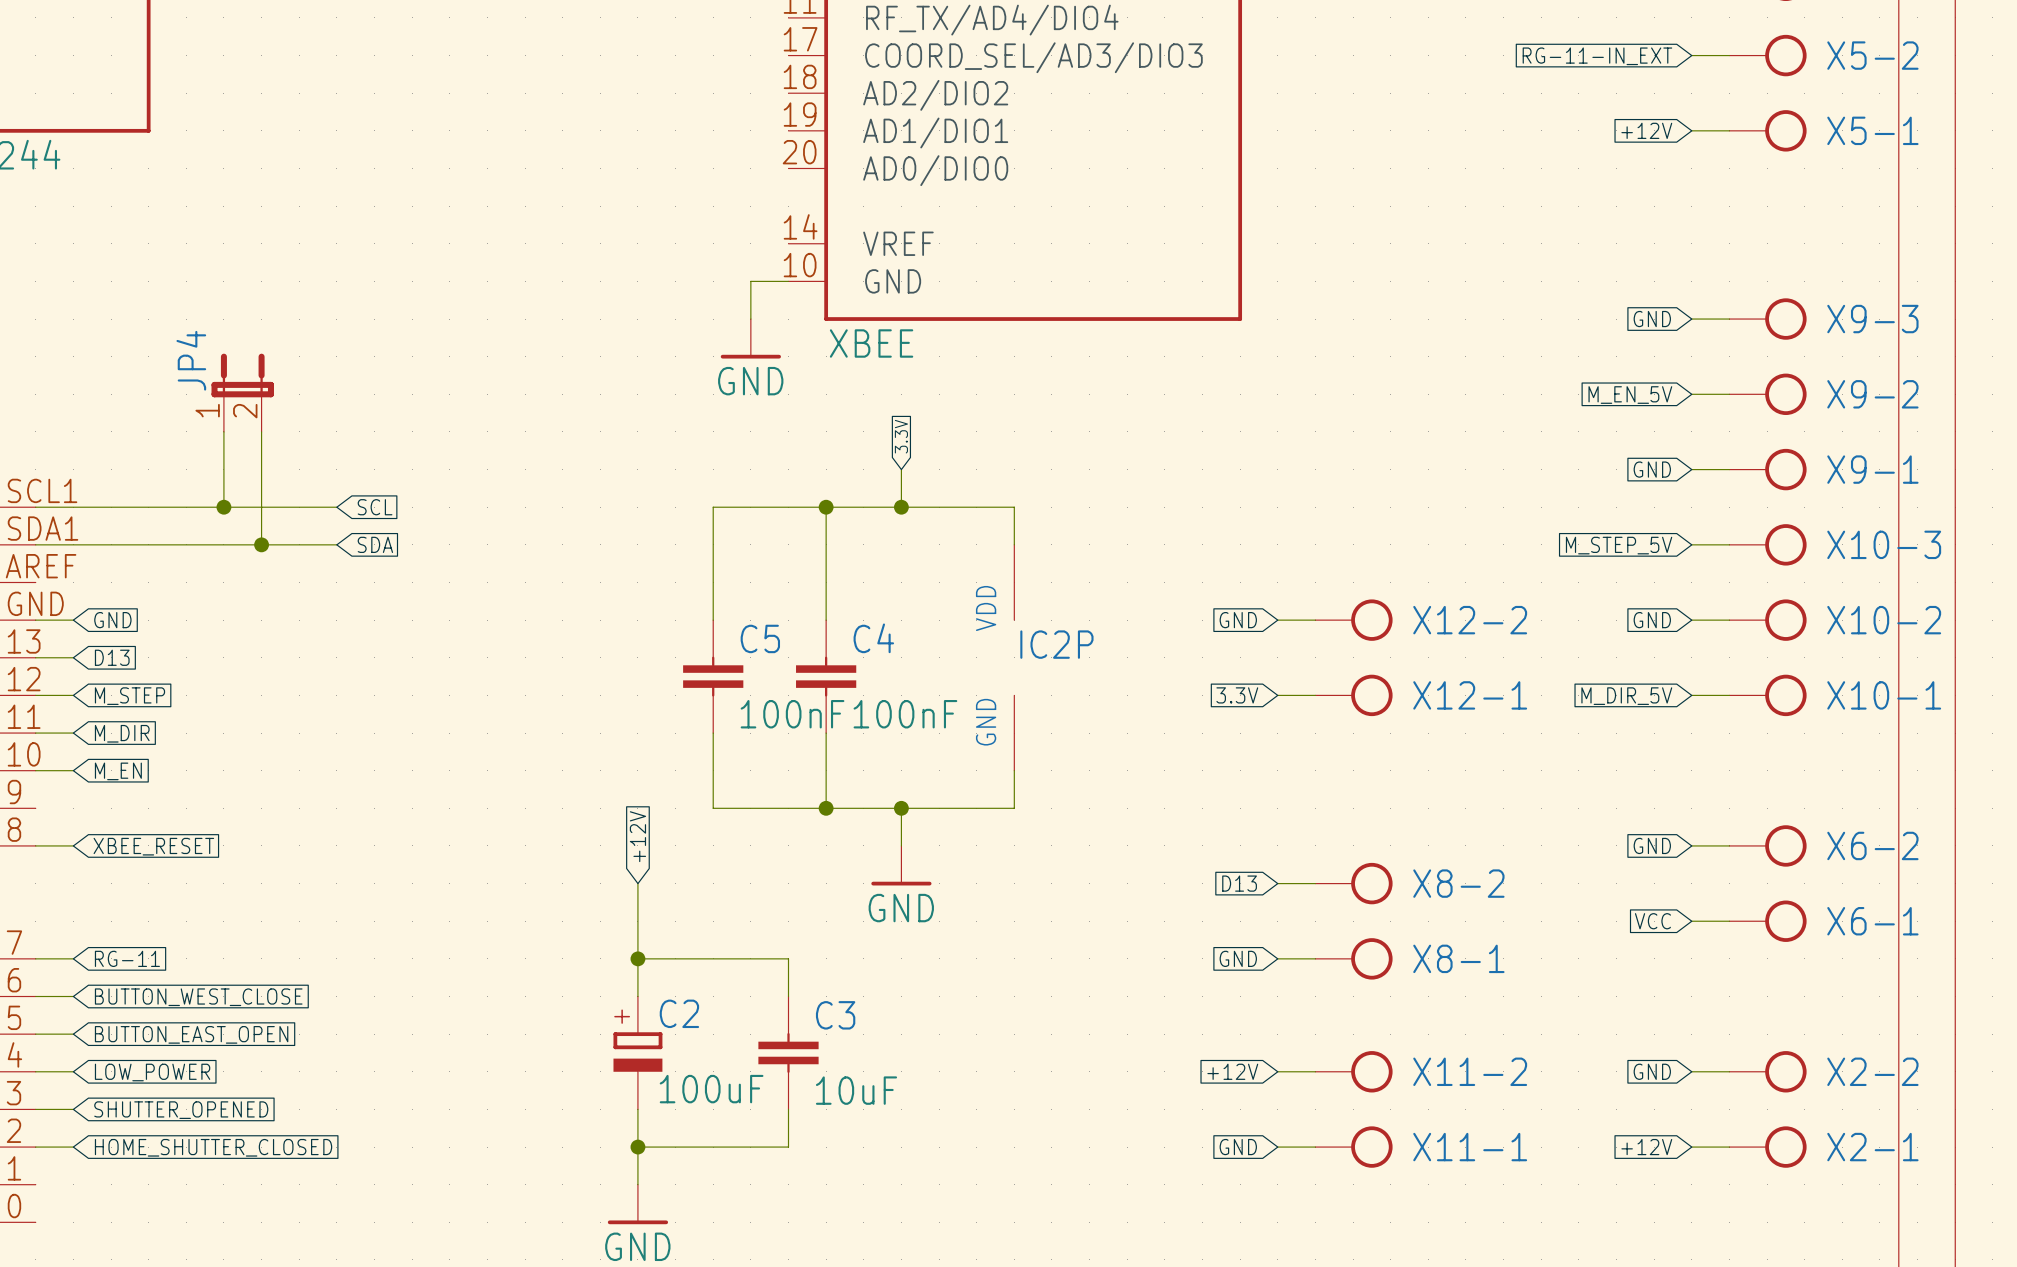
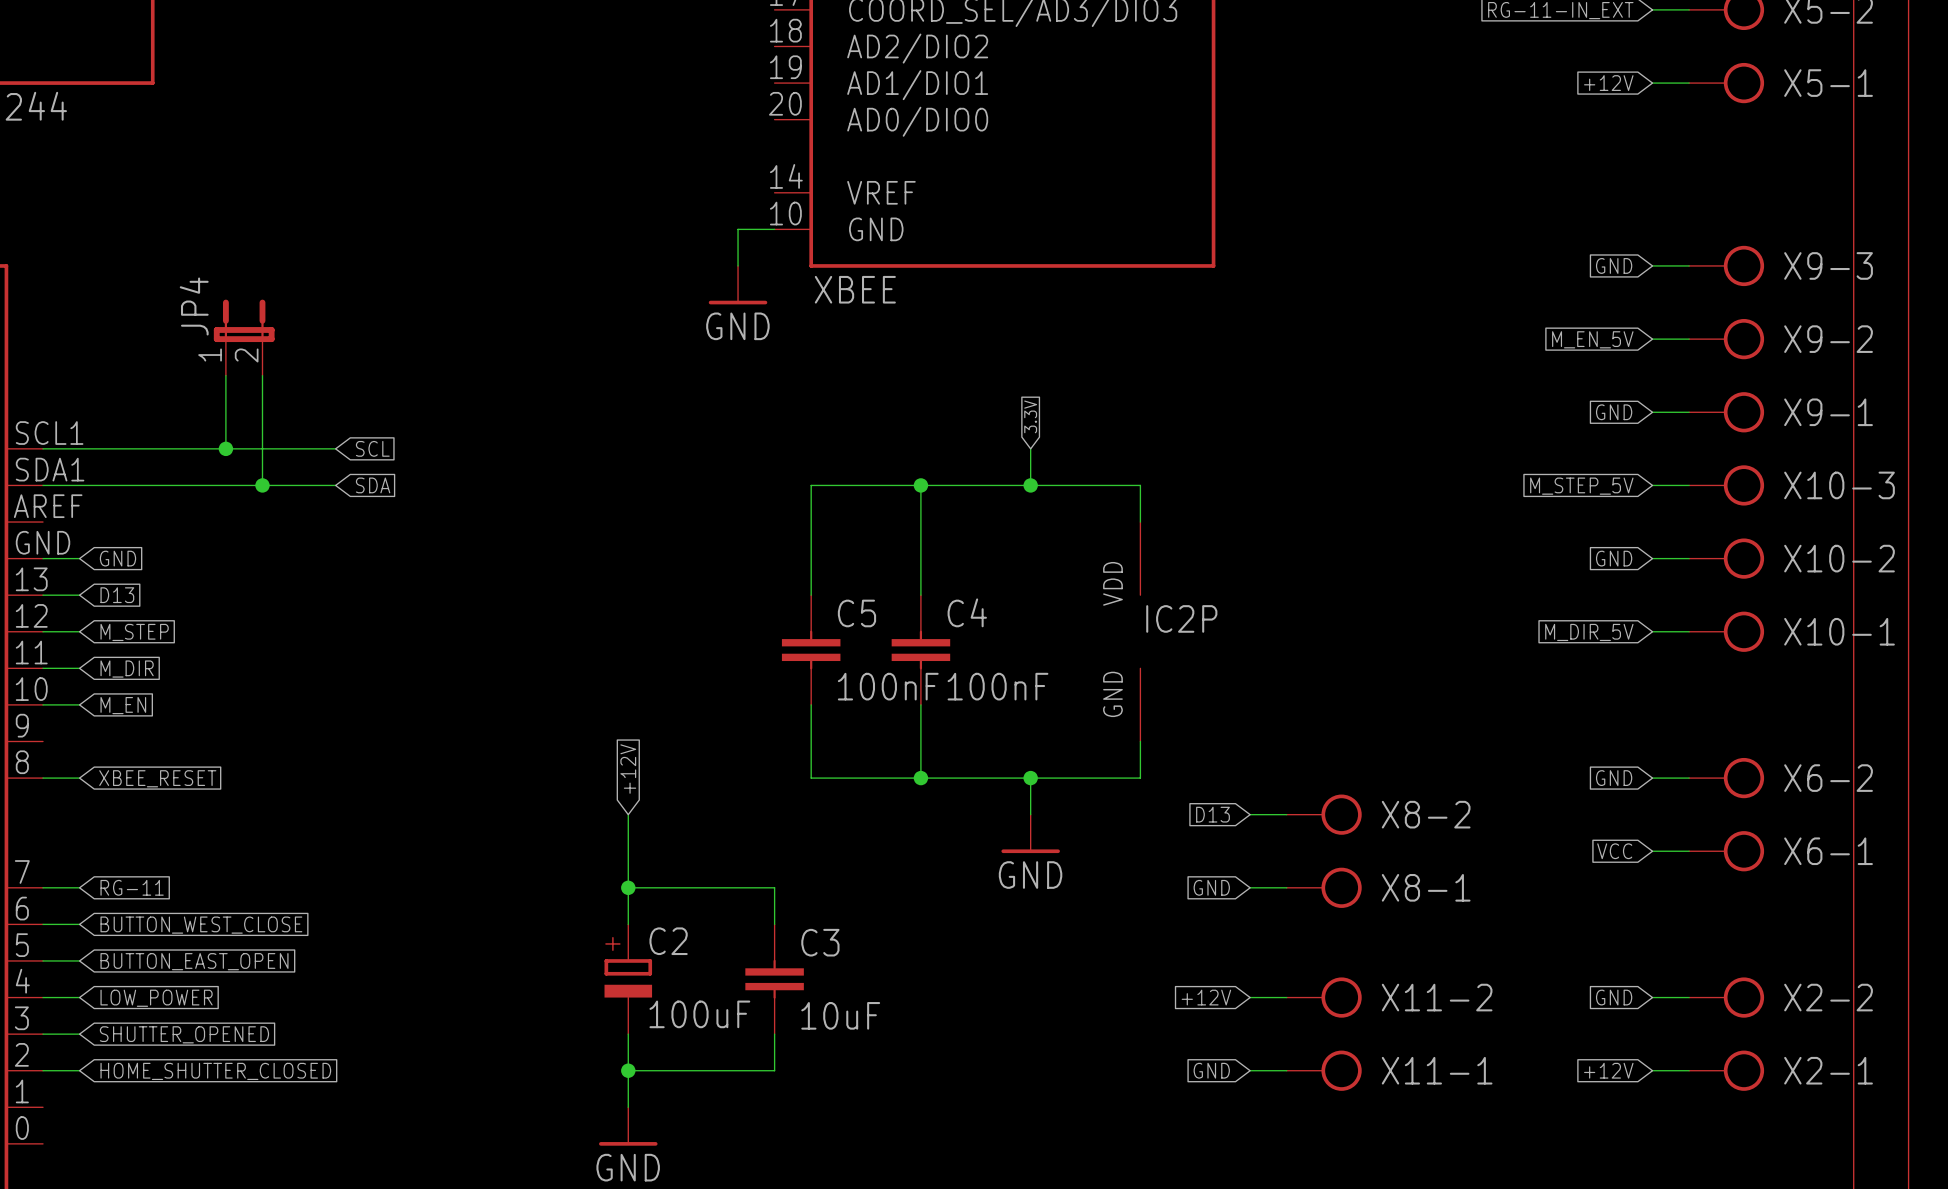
global label: 3.3V (901, 436) -> none
wire: (901, 469) (901, 507) -> (1030, 448) (1030, 485)
global label: none -> 3.3V (1030, 416)
wire: (826, 507) (826, 544) -> (1140, 522) (1140, 485) (811, 485)
junction: (826, 507) -> none
junction position: (901, 507) -> (920, 485)
wire: none -> (920, 485) (920, 595)
wire: (1014, 544) (1014, 507) (713, 507) (713, 620) -> none
junction: none -> (1030, 485)
global label: GND (1238, 620) -> none
wire: (1277, 620) (1315, 620) -> none
X12-2: (1354, 620) -> none
IC2P position: (1014, 657) -> (1140, 631)
C5 position: (713, 676) -> (811, 650)
C4 position: (826, 676) -> (920, 650)
global label: 3.3V (1237, 695) -> none
wire: (1277, 695) (1315, 695) -> none
X12-1: (1354, 695) -> none
wire: (713, 733) (713, 808) (1014, 808) (1014, 770) -> none
wire: none -> (920, 704) (920, 778)
wire: none -> (811, 741) (811, 778) (1140, 778) (1140, 741)
junction: (826, 808) -> none
wire: (901, 808) (901, 845) -> (1030, 778) (1030, 814)
junction position: (901, 808) -> (920, 778)
junction: none -> (1030, 778)
power symbol position: GND (901, 865) -> GND (1030, 833)

